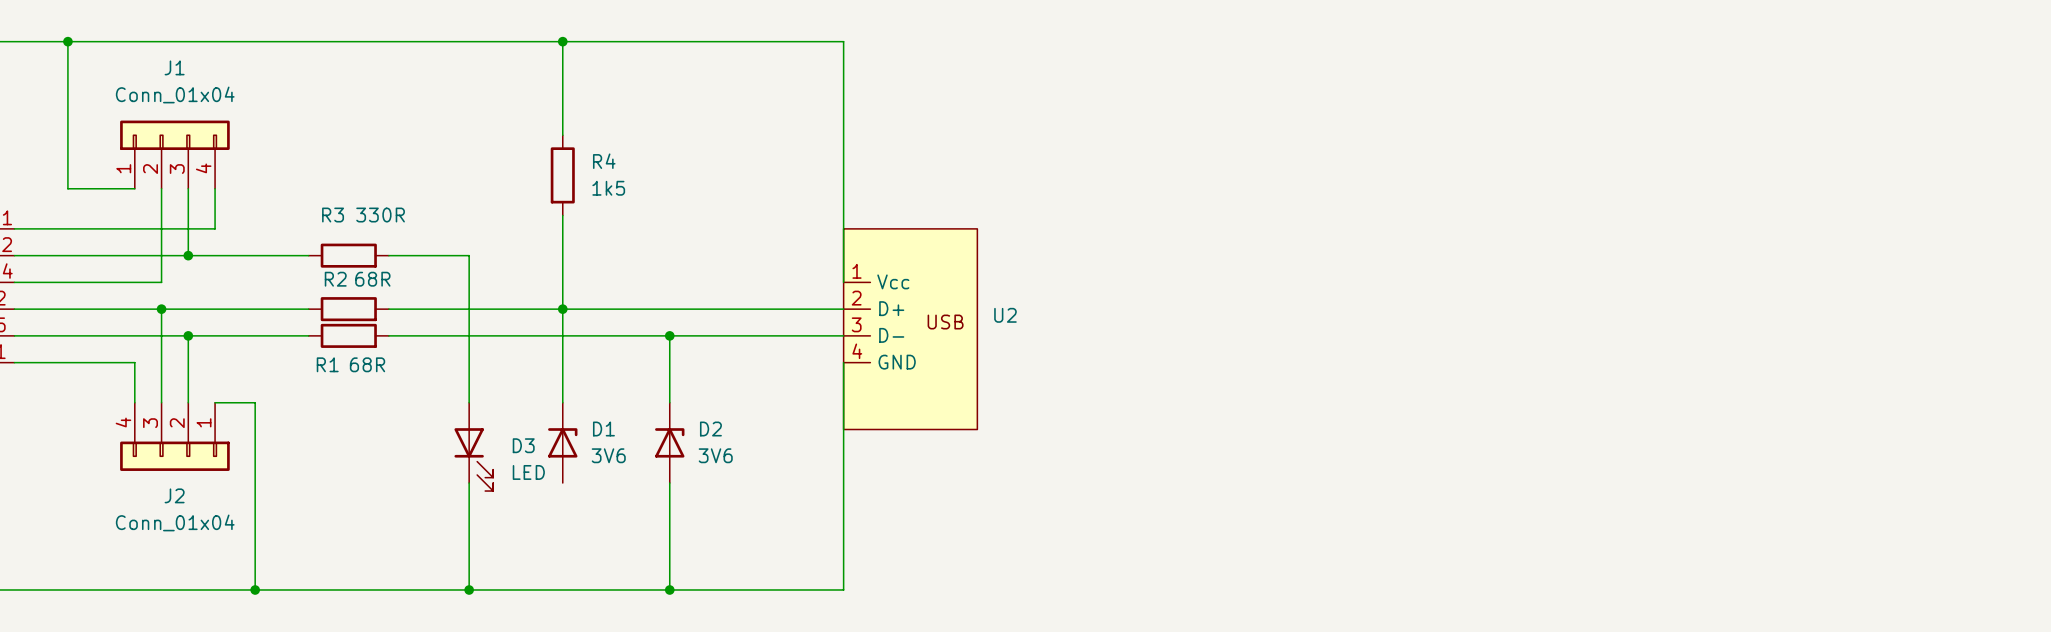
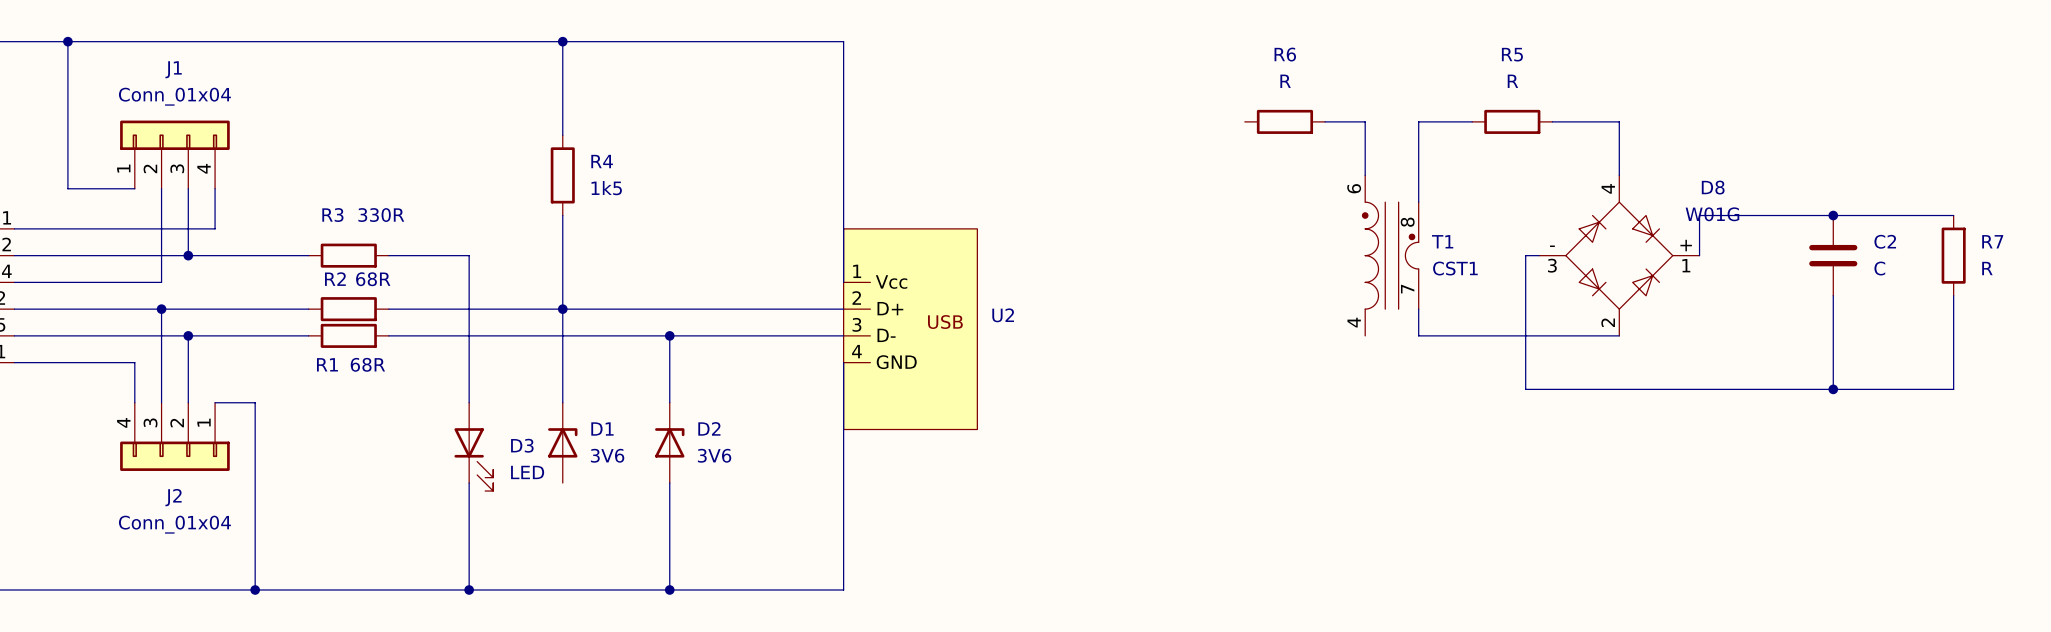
R6: none -> R (1284, 121)
wire: none -> (1325, 121) (1365, 121) (1365, 175)
wire: none -> (1472, 121) (1418, 121) (1418, 202)
R5: none -> R (1512, 121)
wire: none -> (1552, 121) (1619, 121) (1619, 175)
junction: none -> (1833, 215)
wire: none -> (1953, 215) (1699, 215) (1699, 255)
T1: none -> CST1 (1390, 255)
wire: none -> (1539, 255) (1525, 255) (1525, 389) (1953, 389) (1953, 295)
D8: none -> W01G (1619, 255)
C2: none -> C (1833, 255)
R7: none -> R (1953, 255)
wire: none -> (1833, 295) (1833, 389)
wire: none -> (1418, 309) (1418, 335) (1619, 335)
junction: none -> (1833, 389)

